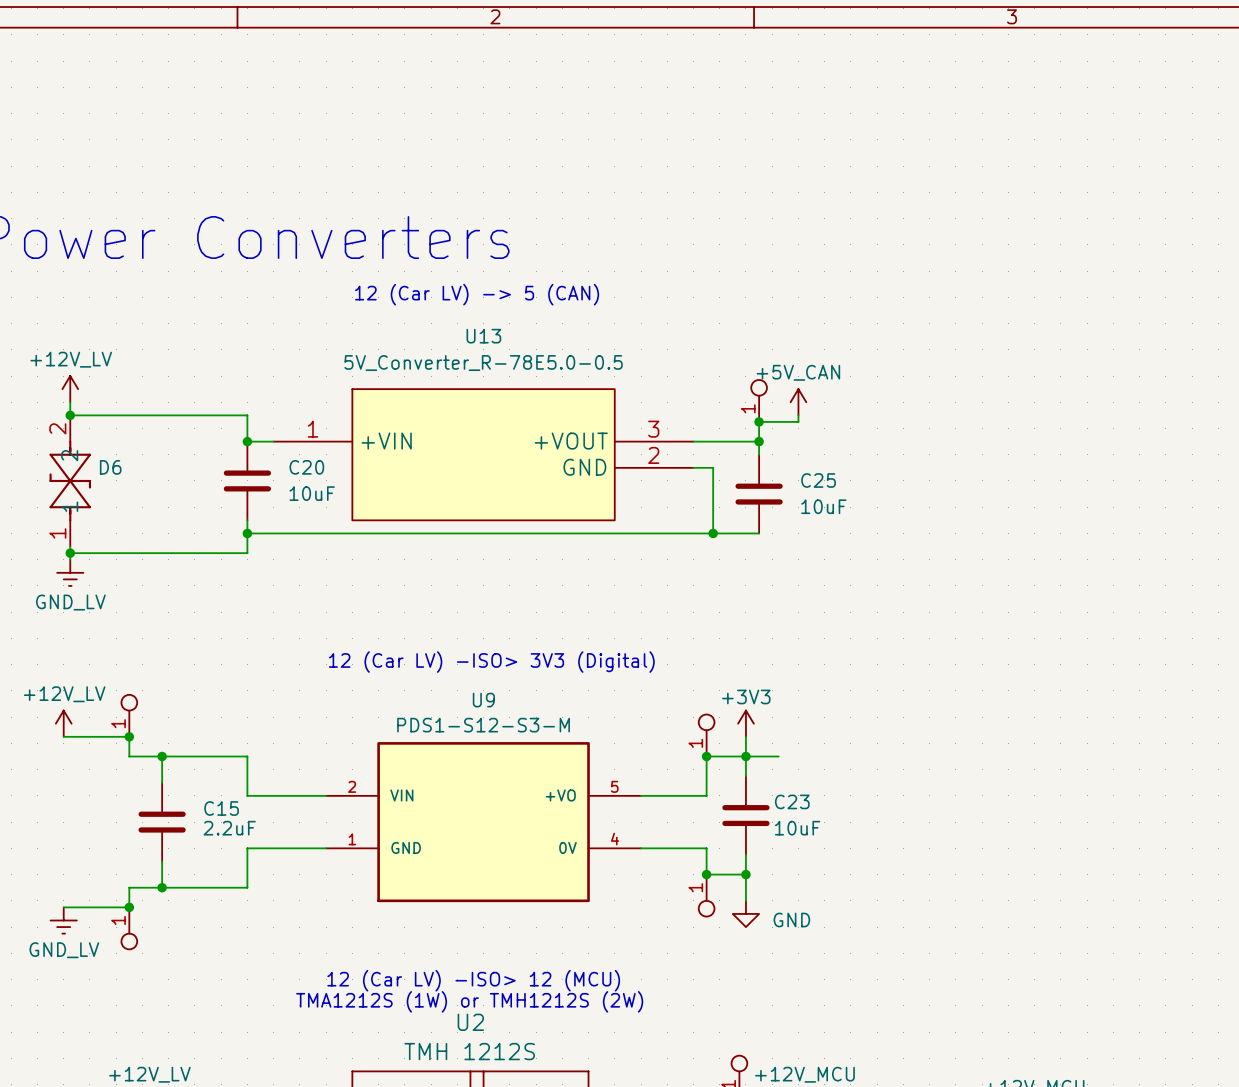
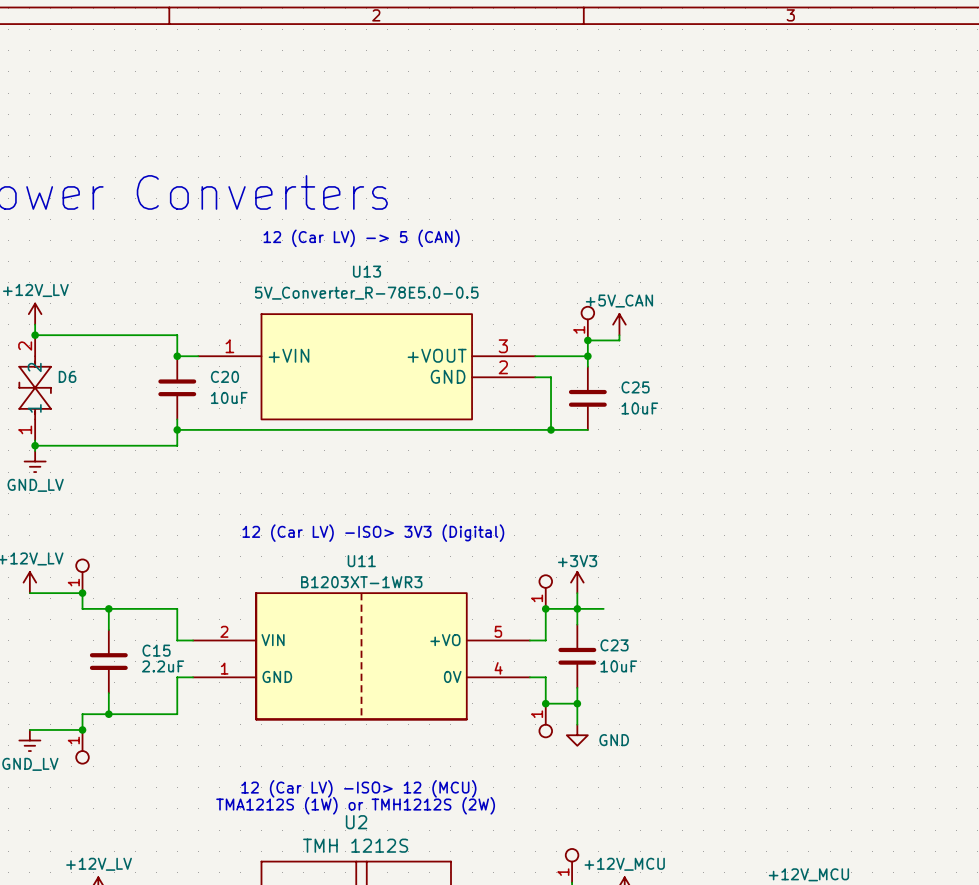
U11: none -> B1203XT-1WR3 (361, 656)
U9: PDS1-S12-S3-M (483, 822) -> none
wire: (247, 848) (326, 848) -> (177, 682) (177, 677) (193, 677)
wire: (641, 848) (706, 848) -> (529, 677) (545, 677) (545, 682)

